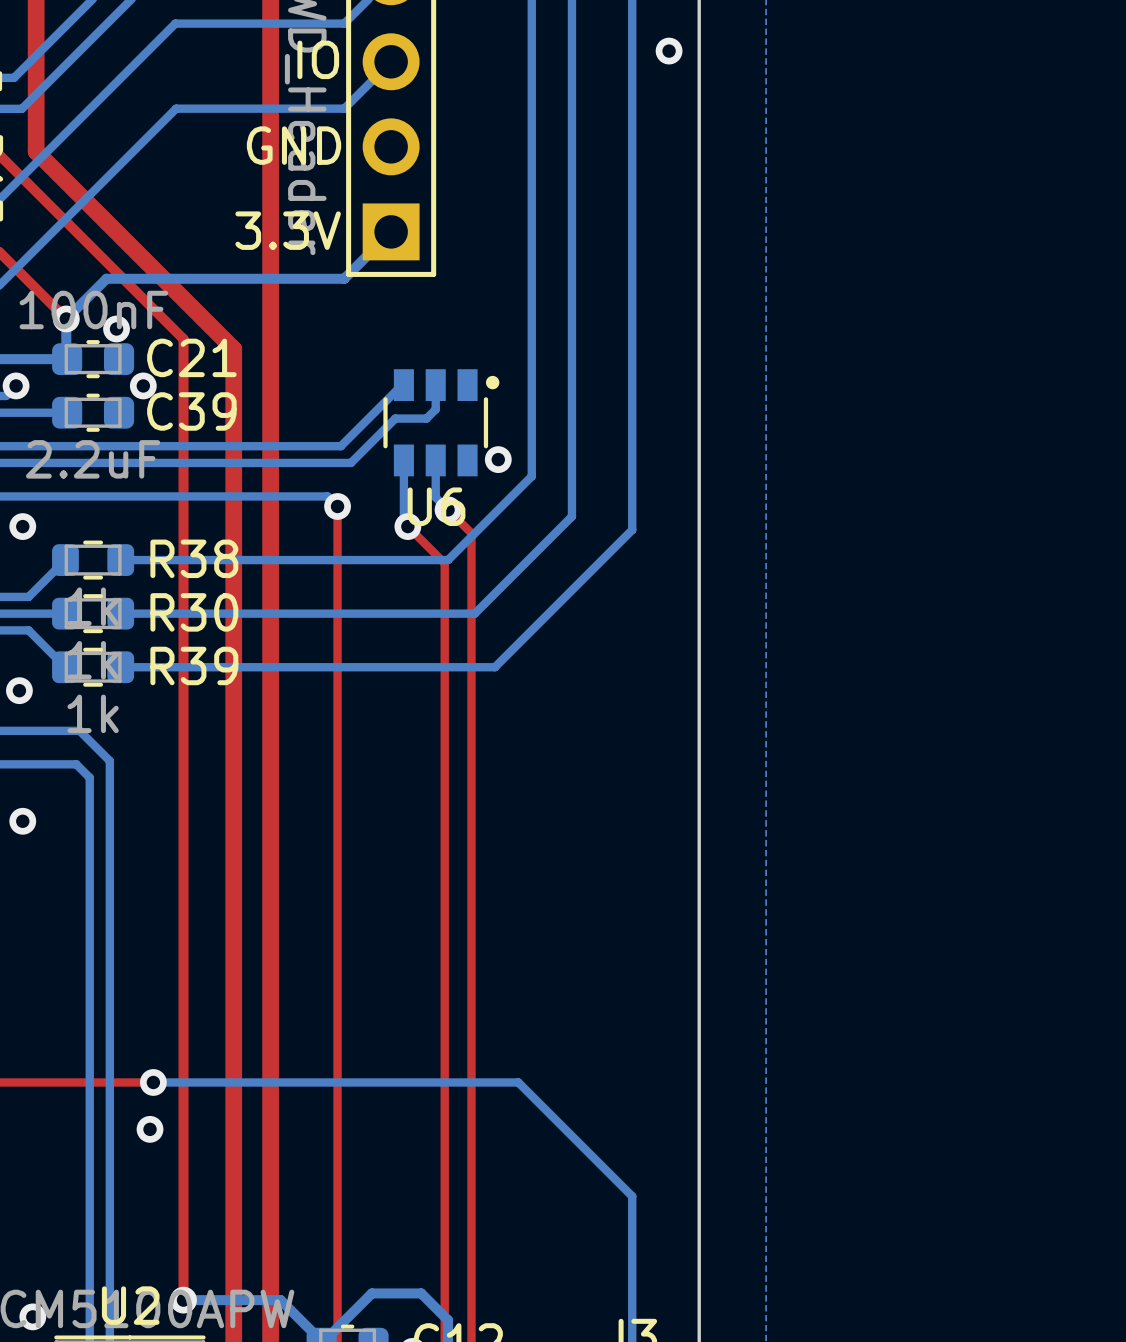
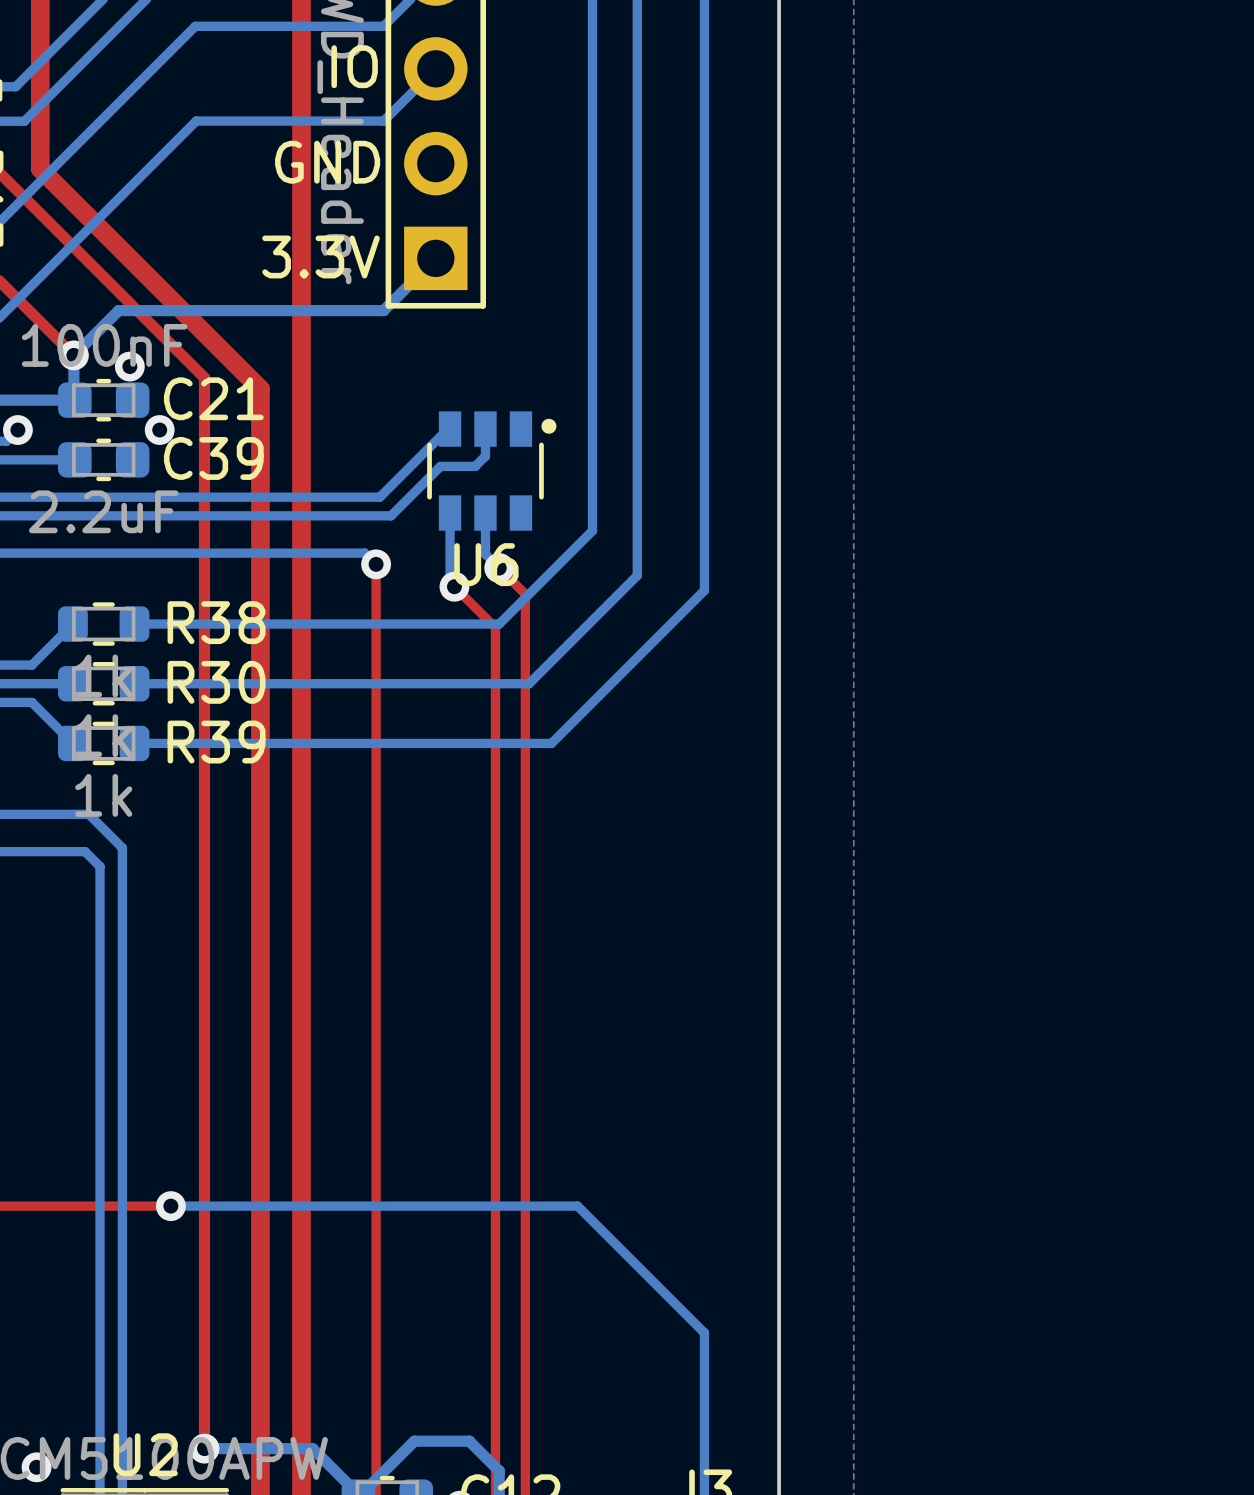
via: (669, 51) -> none
via: (498, 459) -> none
via: (22, 526) -> none
via: (19, 690) -> none
via: (22, 821) -> none
via: (150, 1129) -> none

